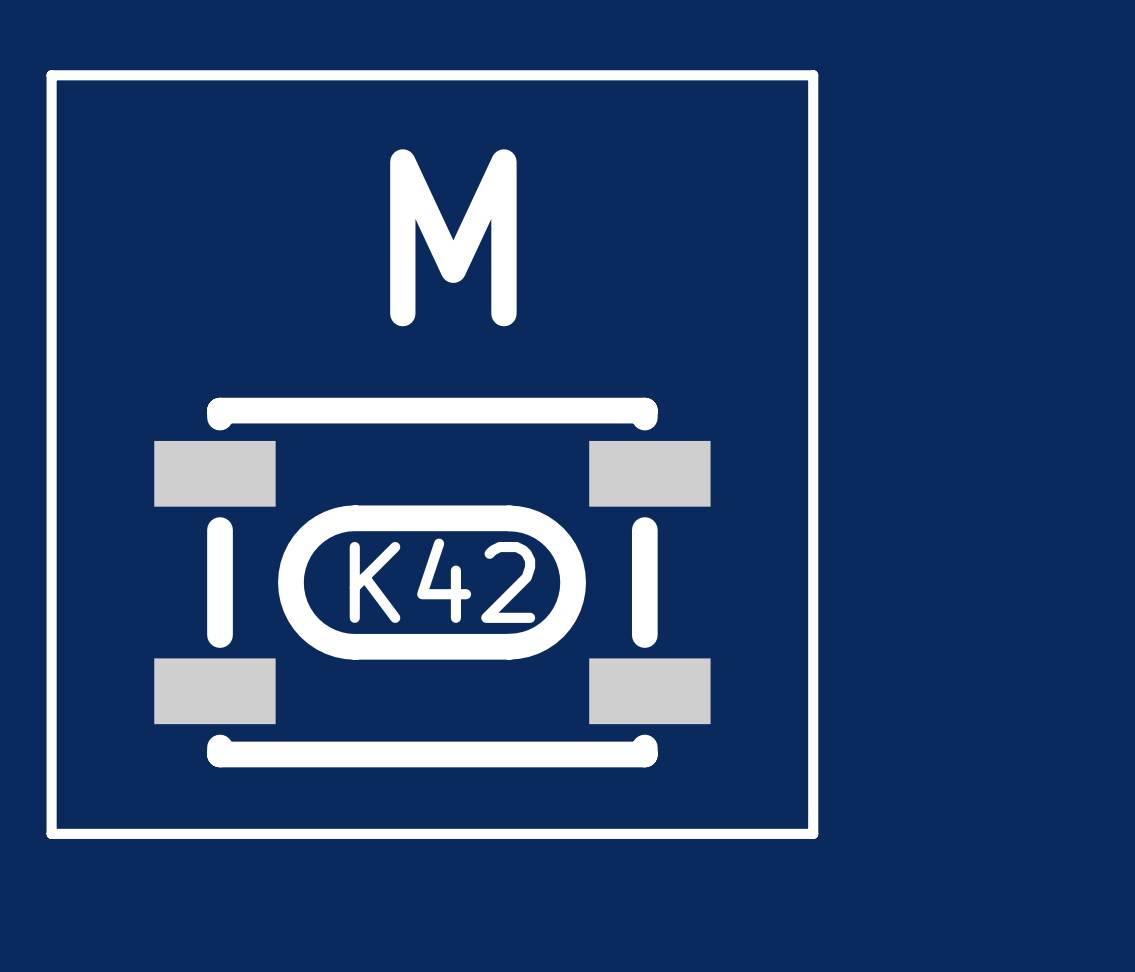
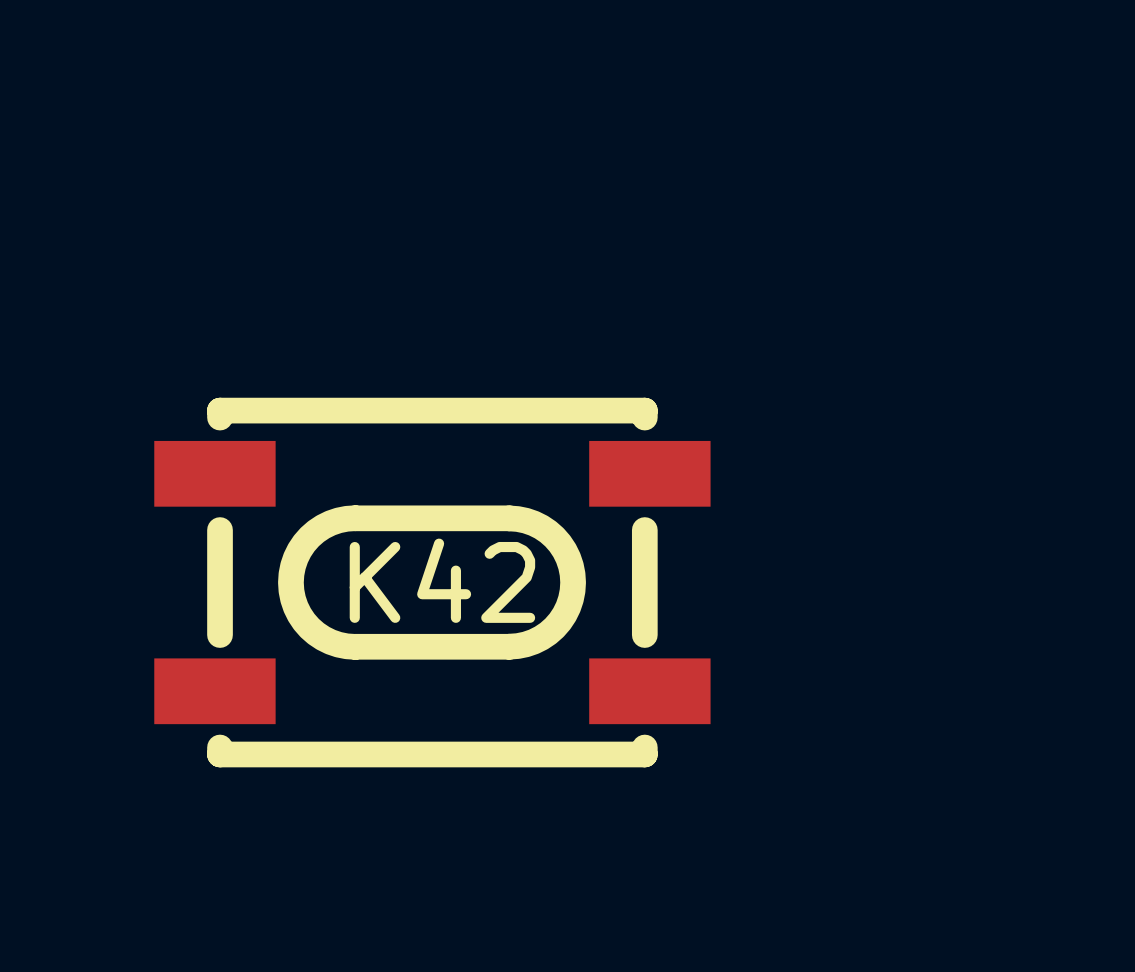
line: (51, 75) (813, 75) (813, 833) (51, 833) (51, 75) -> none
text: M (453, 237) -> none

